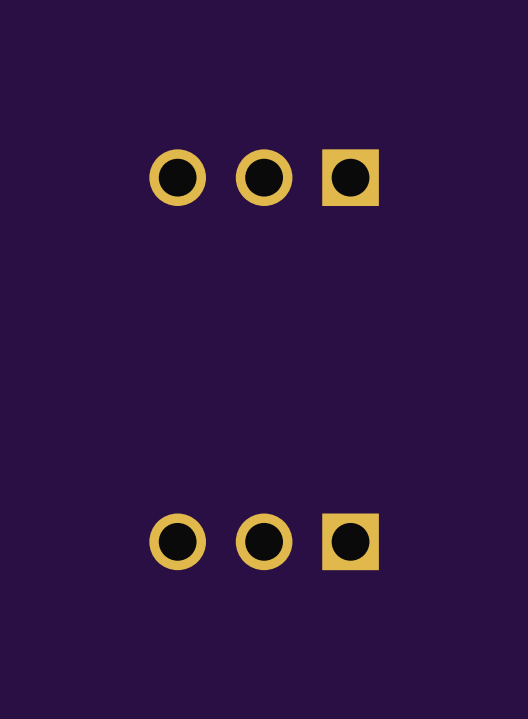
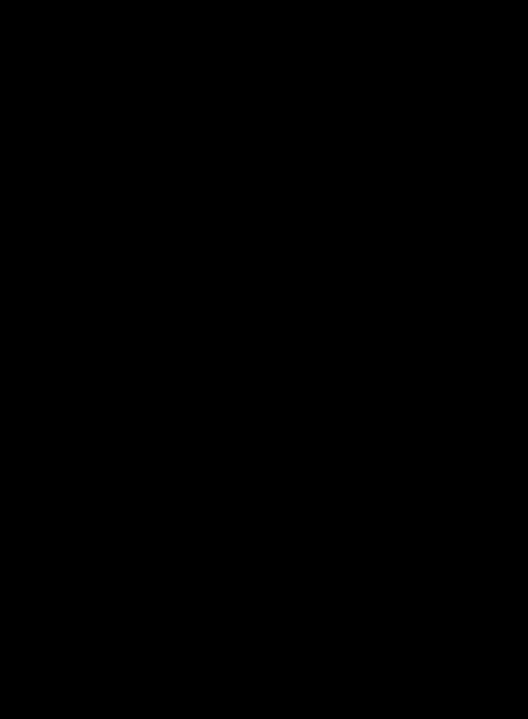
part: (264, 177) -> none
part: (264, 541) -> none

